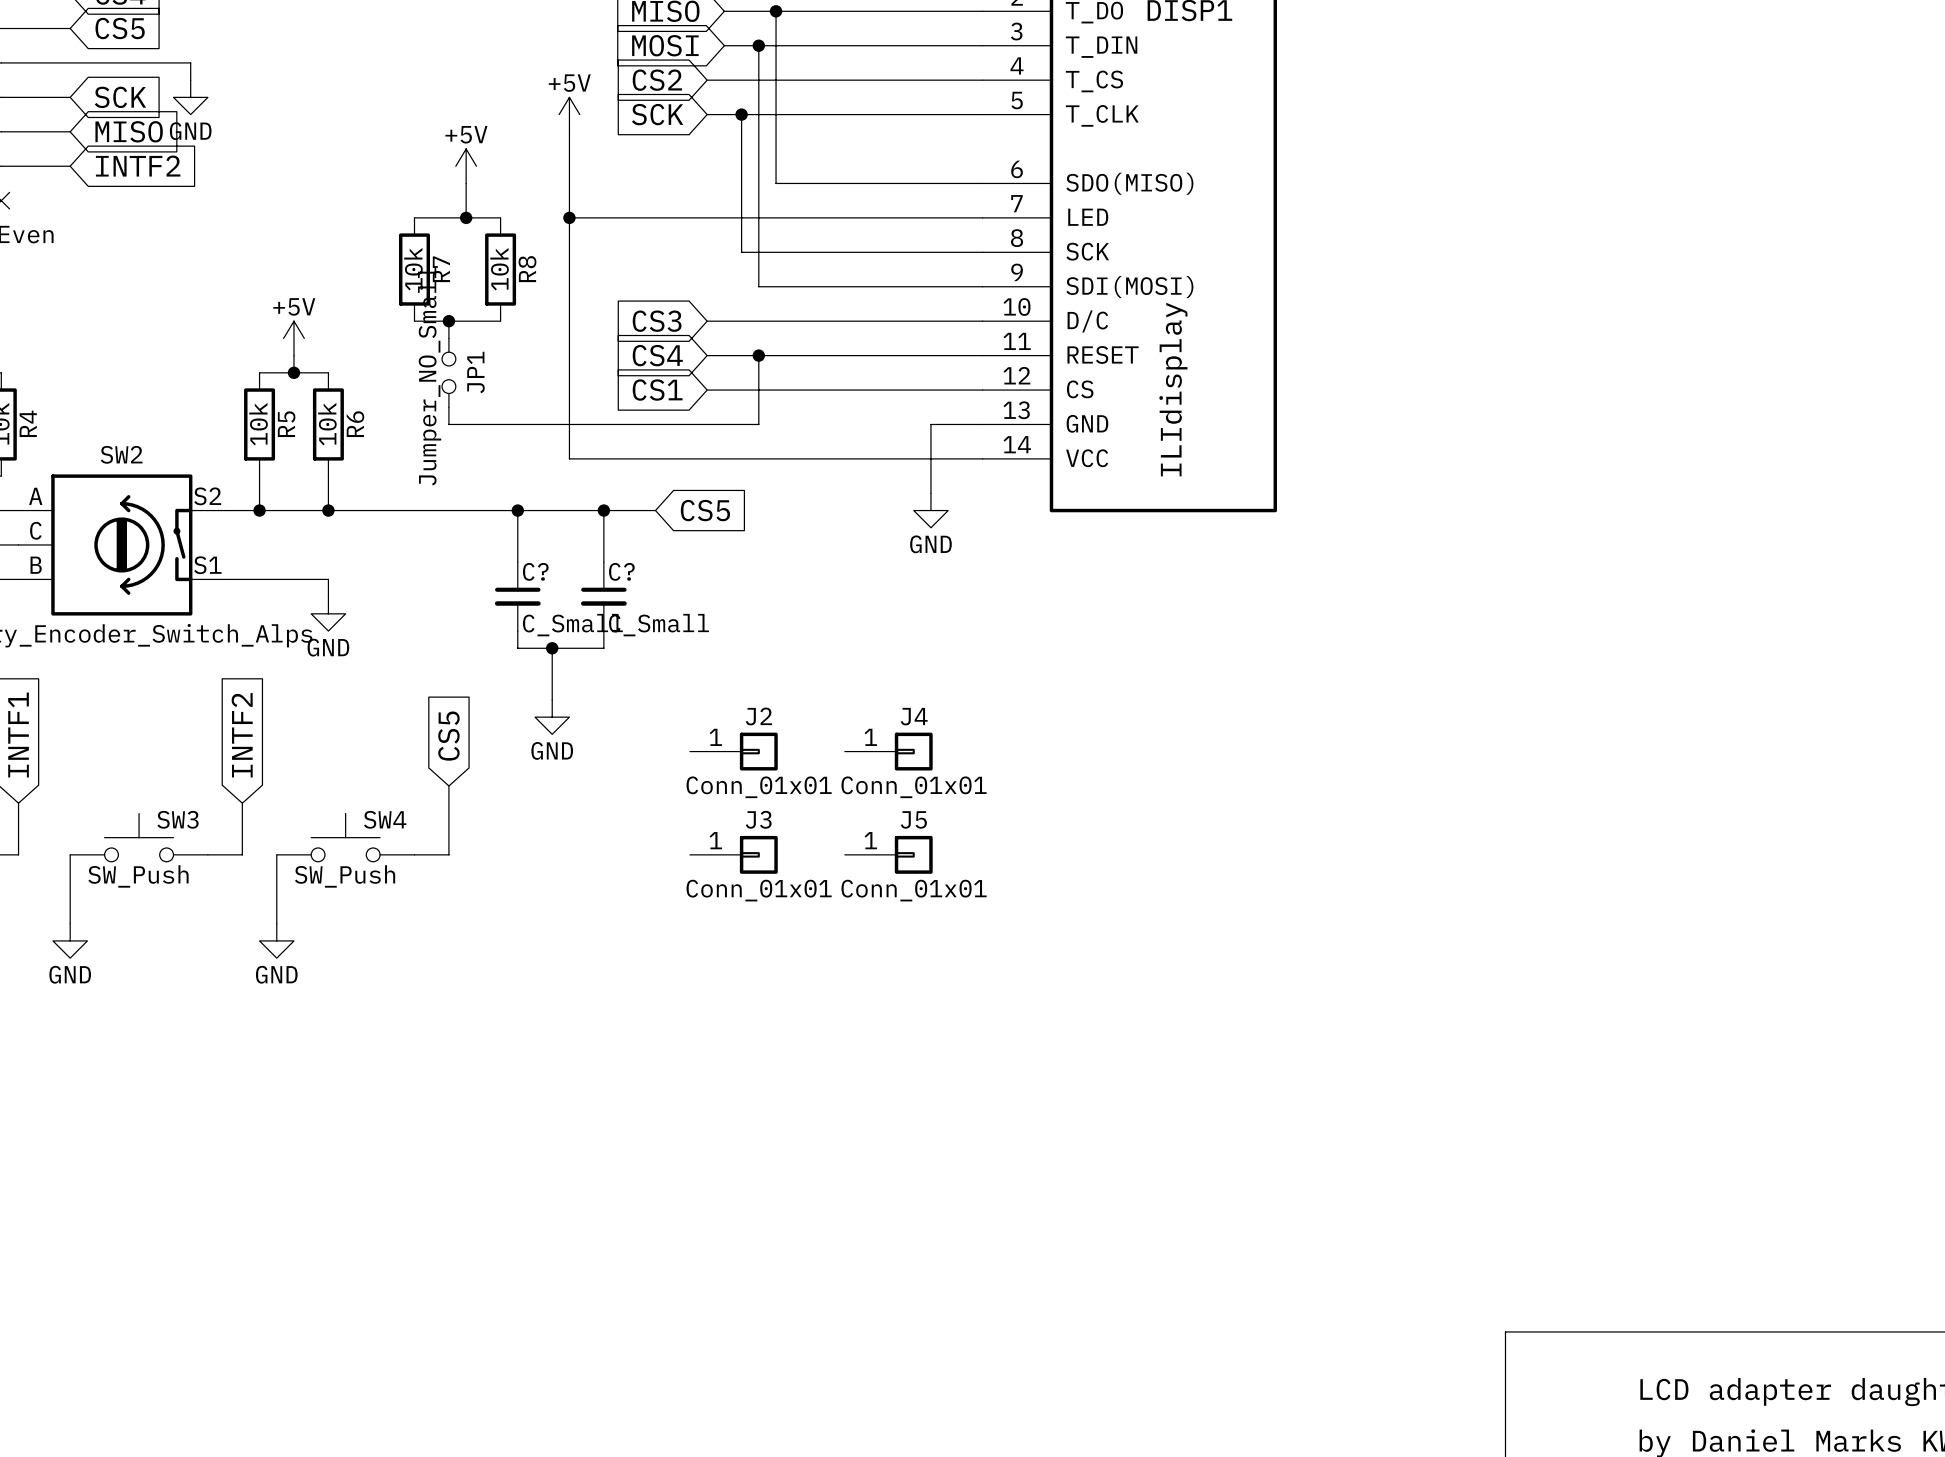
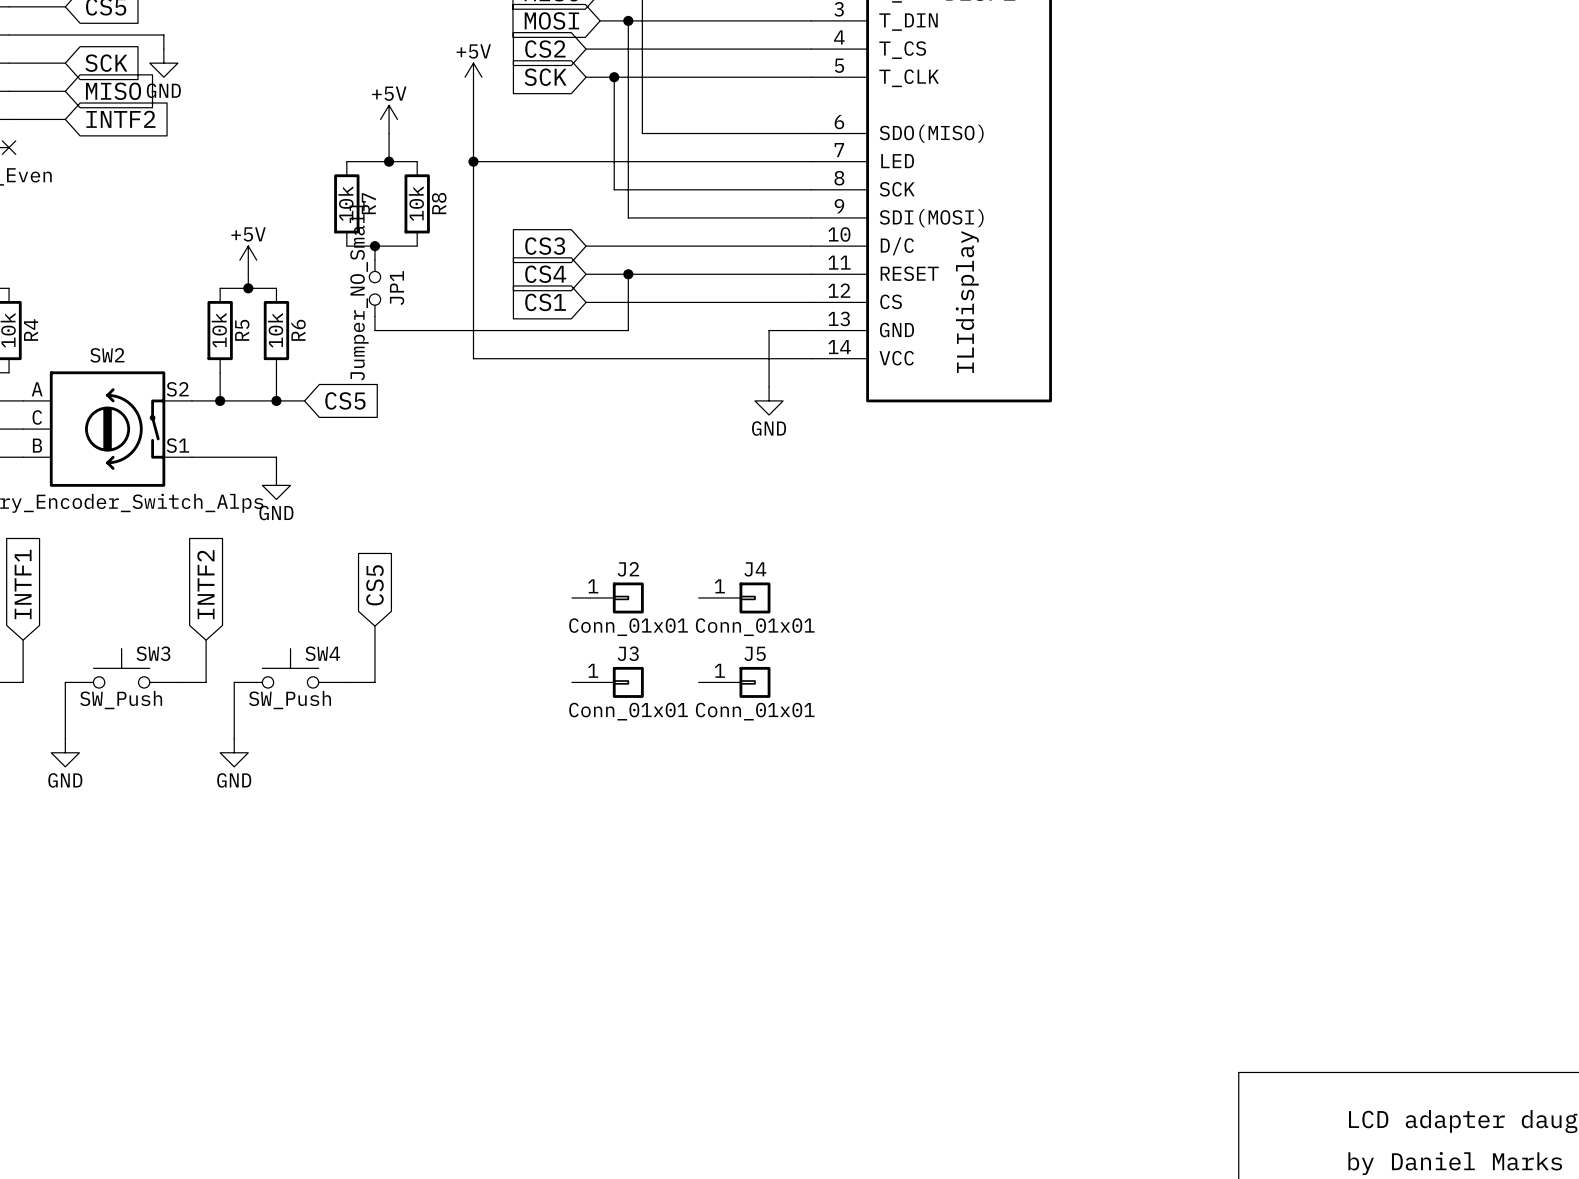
wire: (362, 510) (655, 510) -> none
wire: (517, 510) (517, 562) -> none
junction: (517, 510) -> none
wire: (603, 510) (603, 562) -> none
junction: (603, 510) -> none
global label position: CS5 (705, 510) -> CS5 (345, 400)
C?: C_Small (517, 596) -> none
C?: C_Small (603, 596) -> none
wire: (517, 631) (517, 648) (603, 648) (603, 631) -> none
wire: (552, 648) (552, 699) -> none
junction: (552, 648) -> none
power symbol: GND (552, 717) -> none

